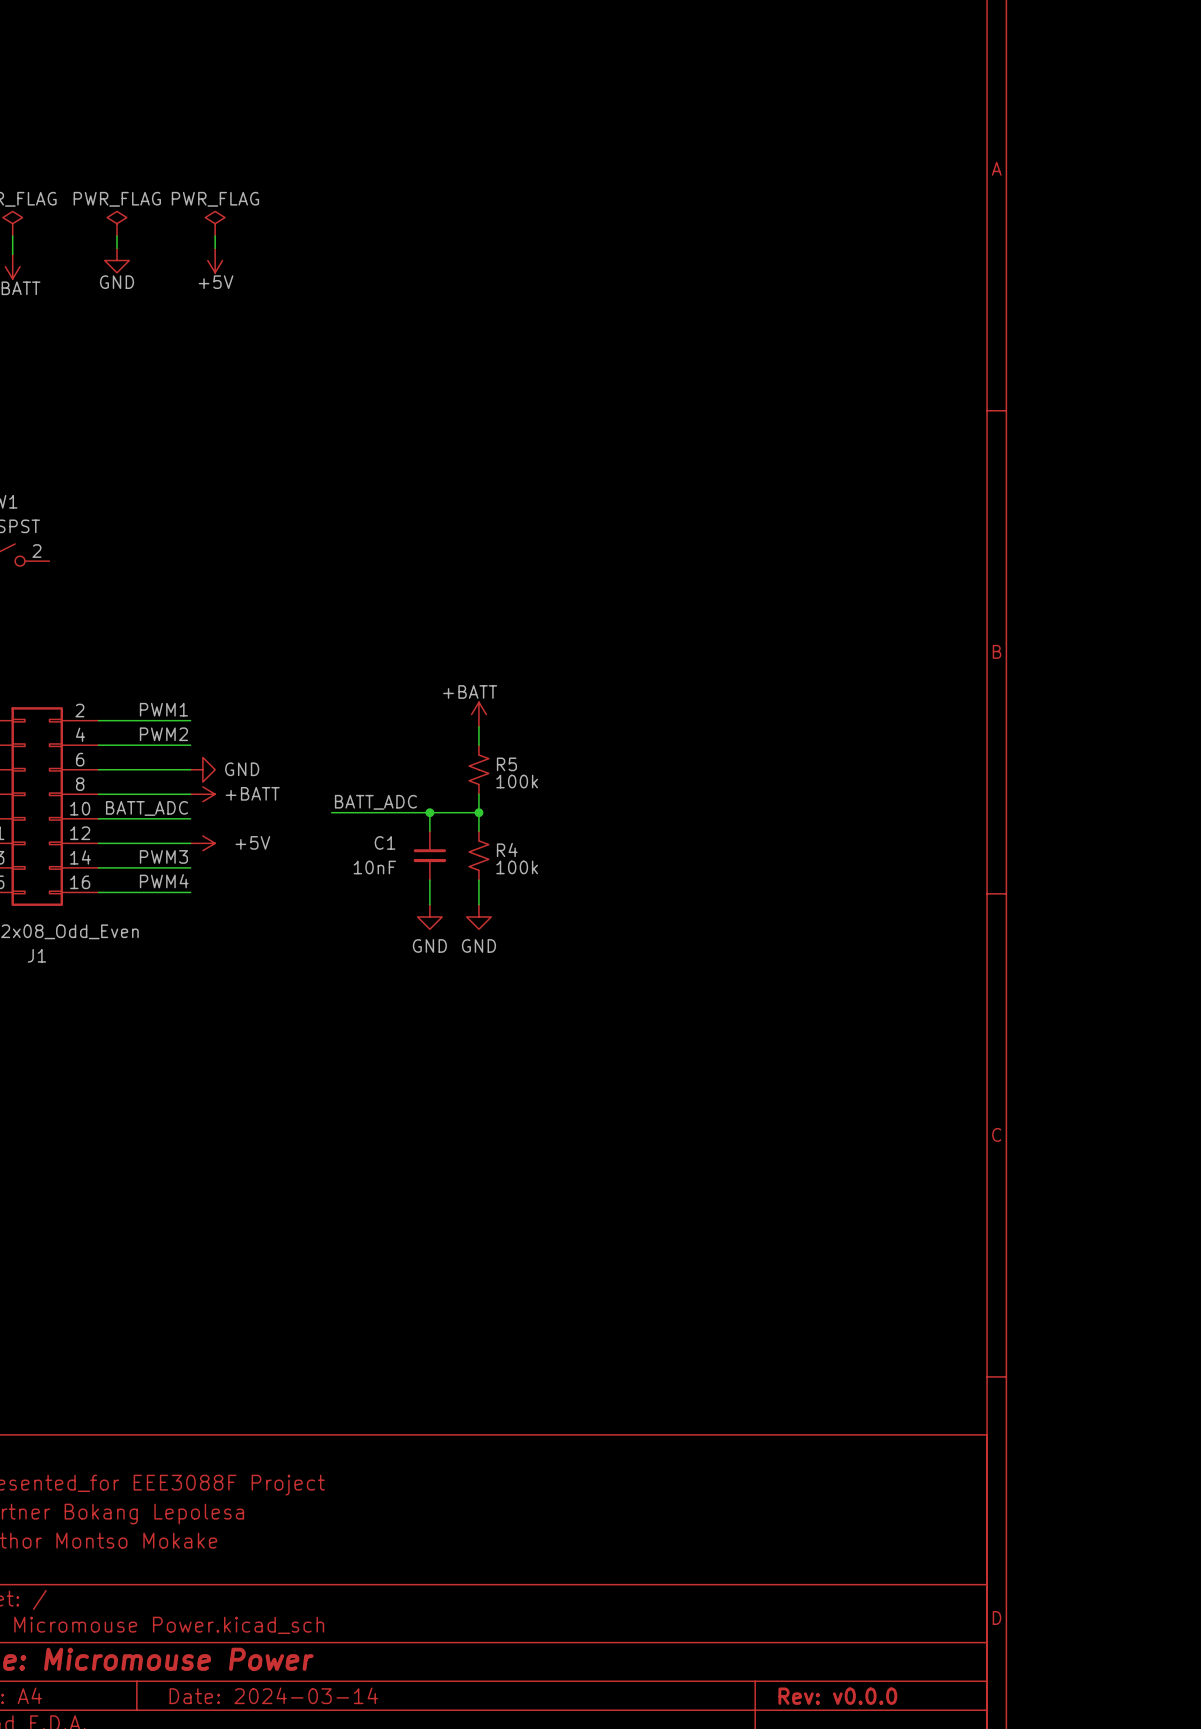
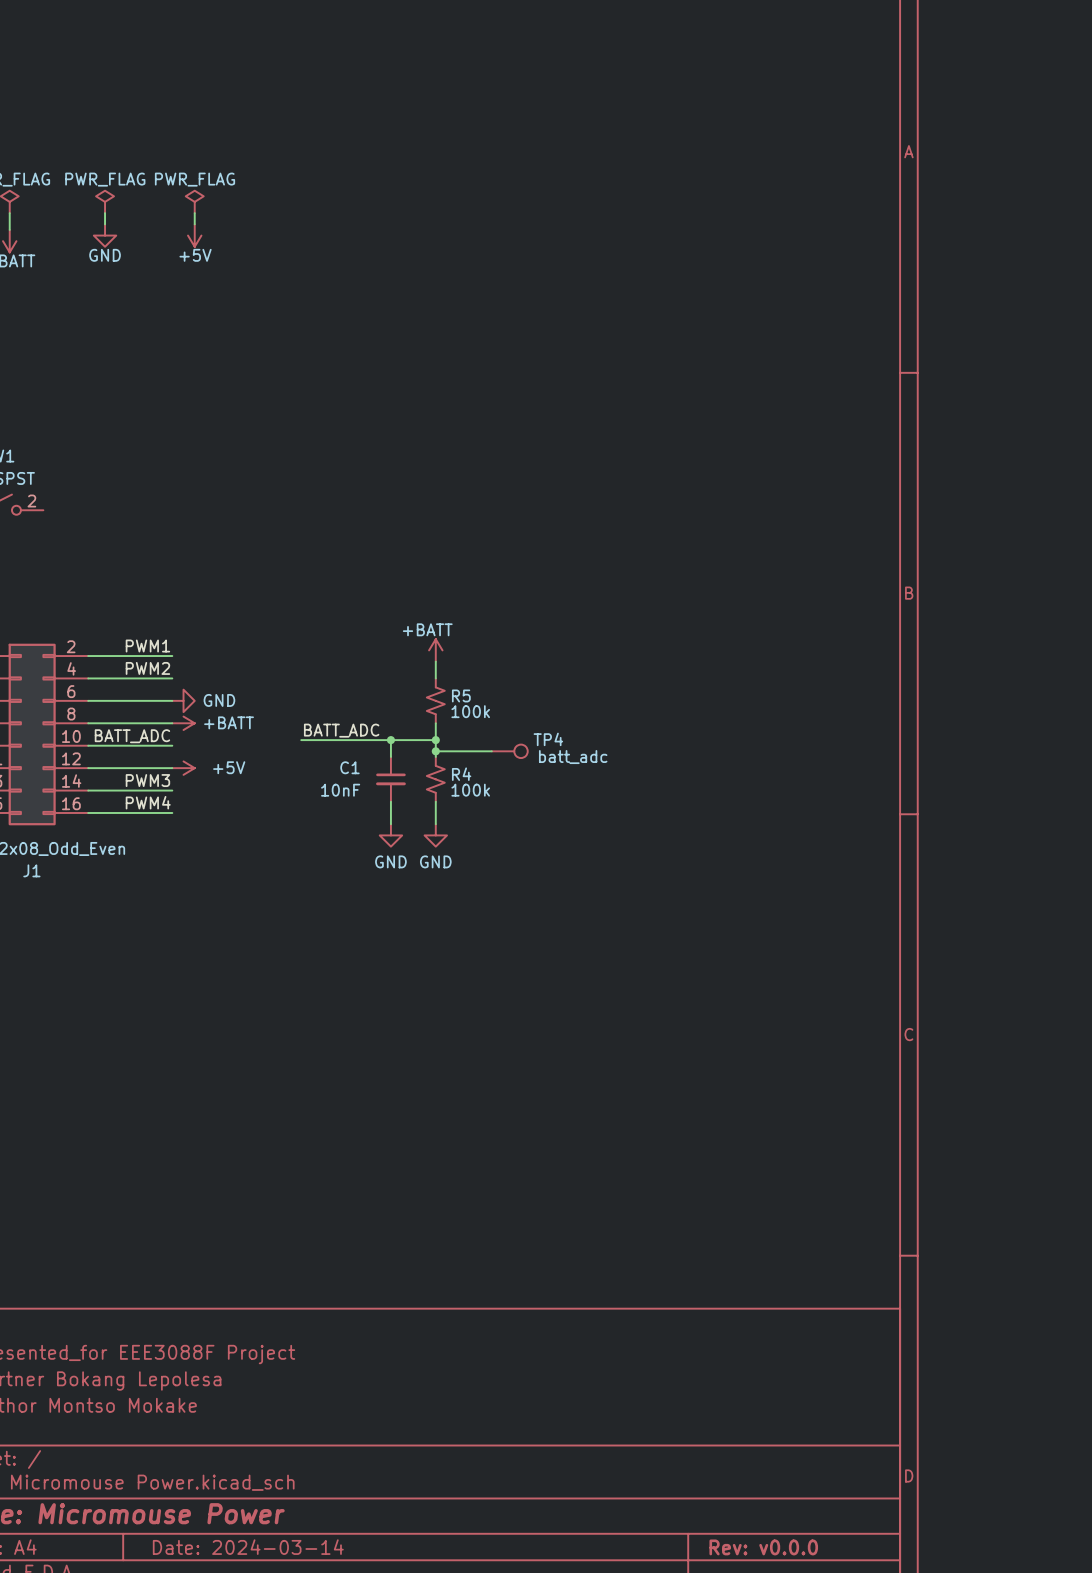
wire: none -> (435, 751) (491, 751)
junction: none -> (435, 751)
TP4: none -> batt_adc (509, 751)

